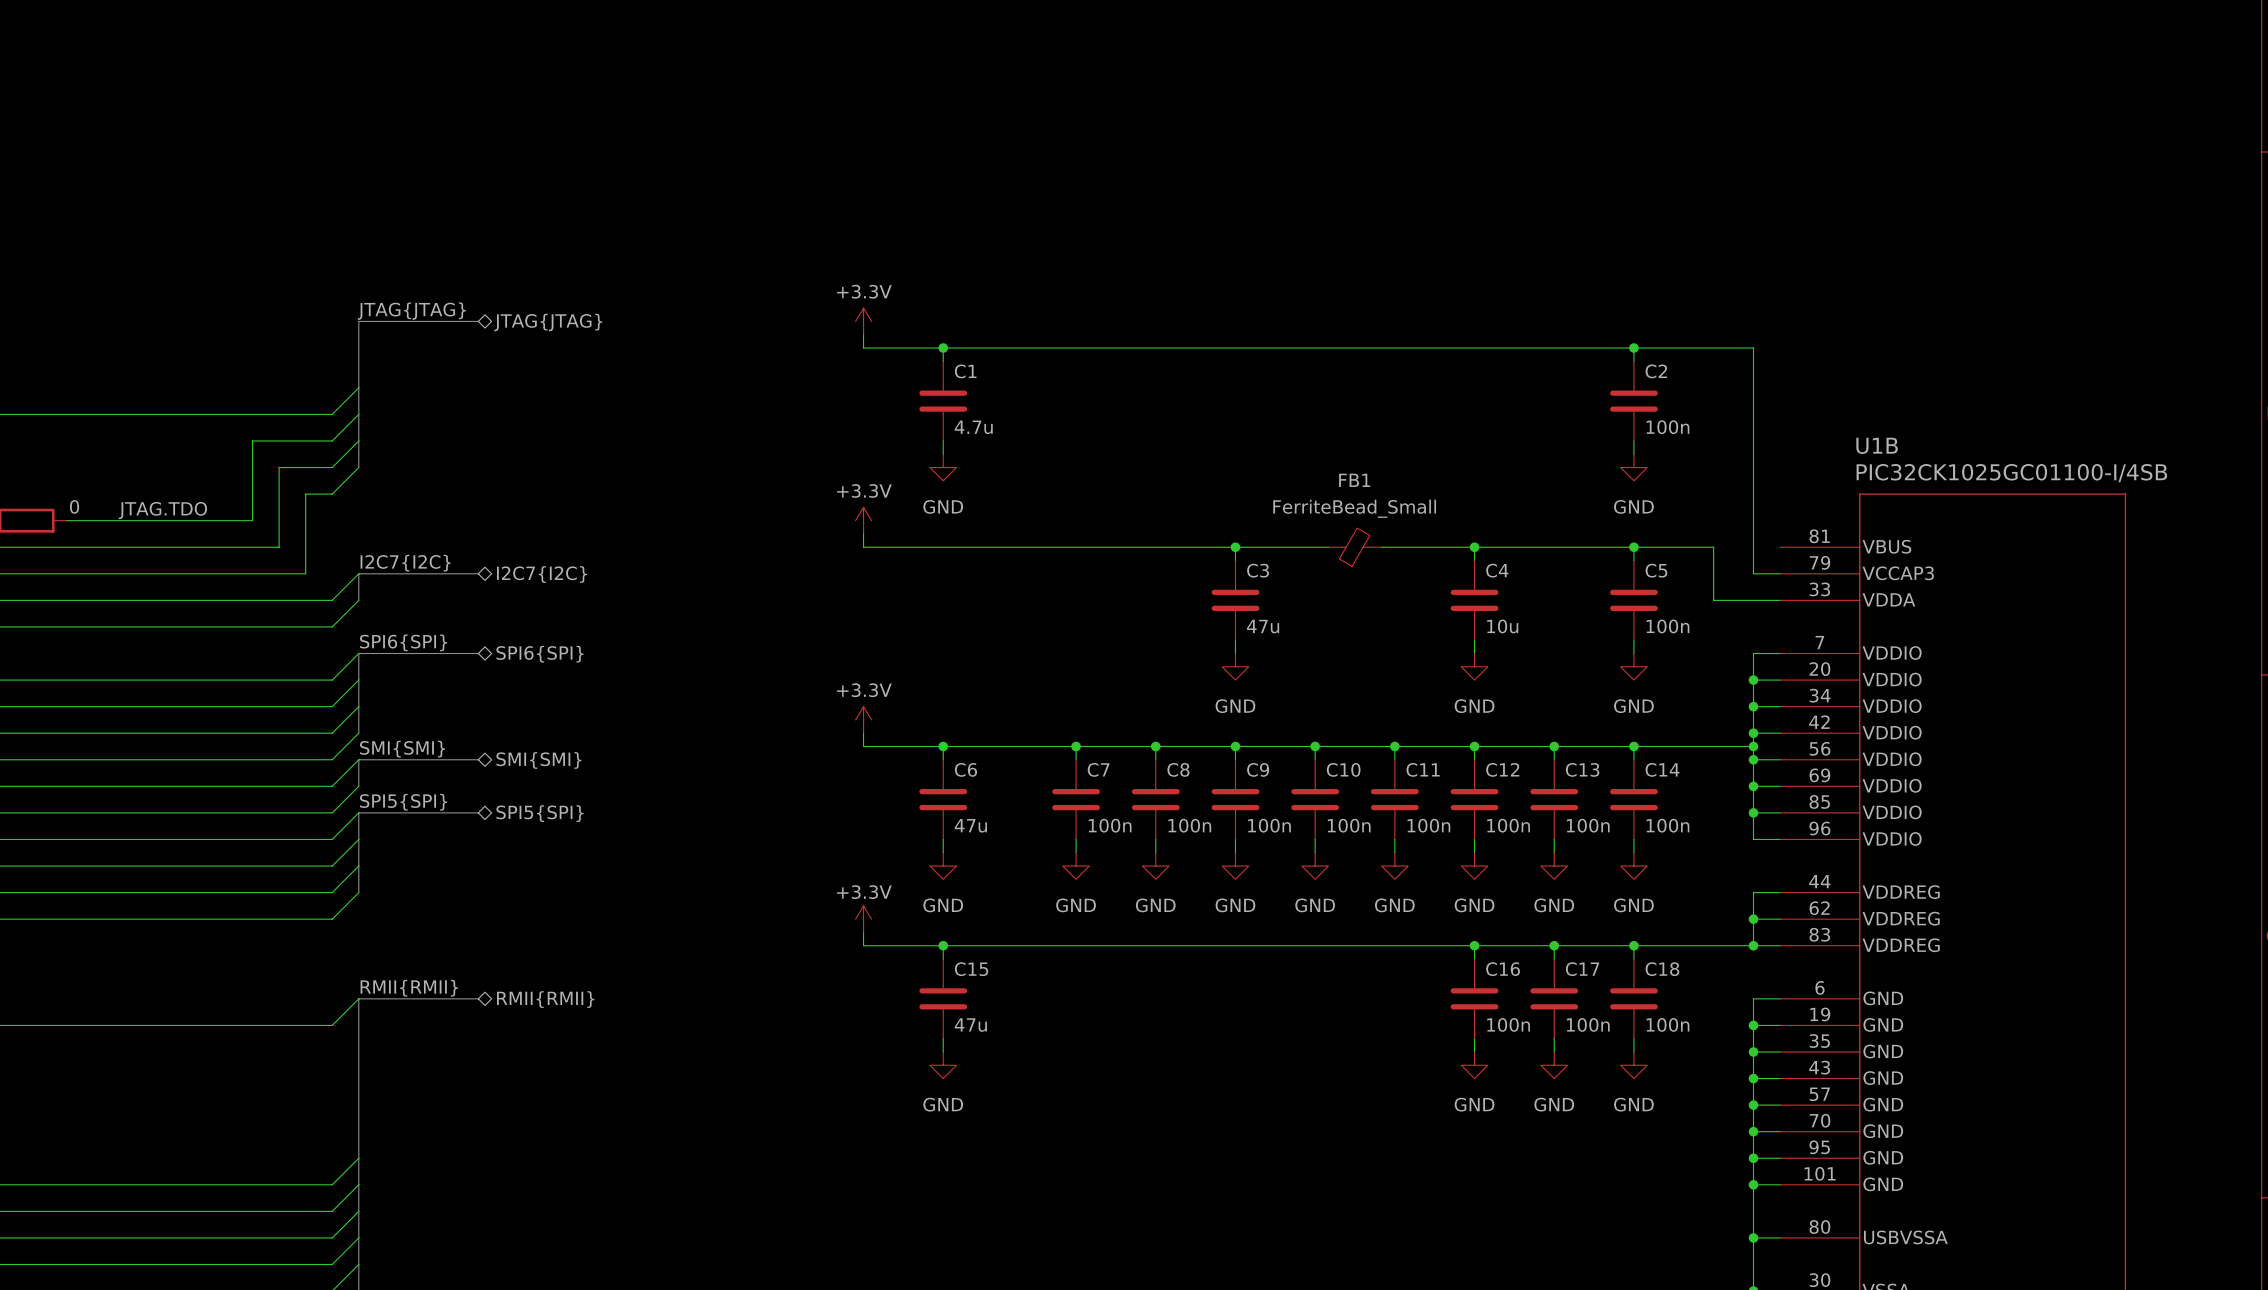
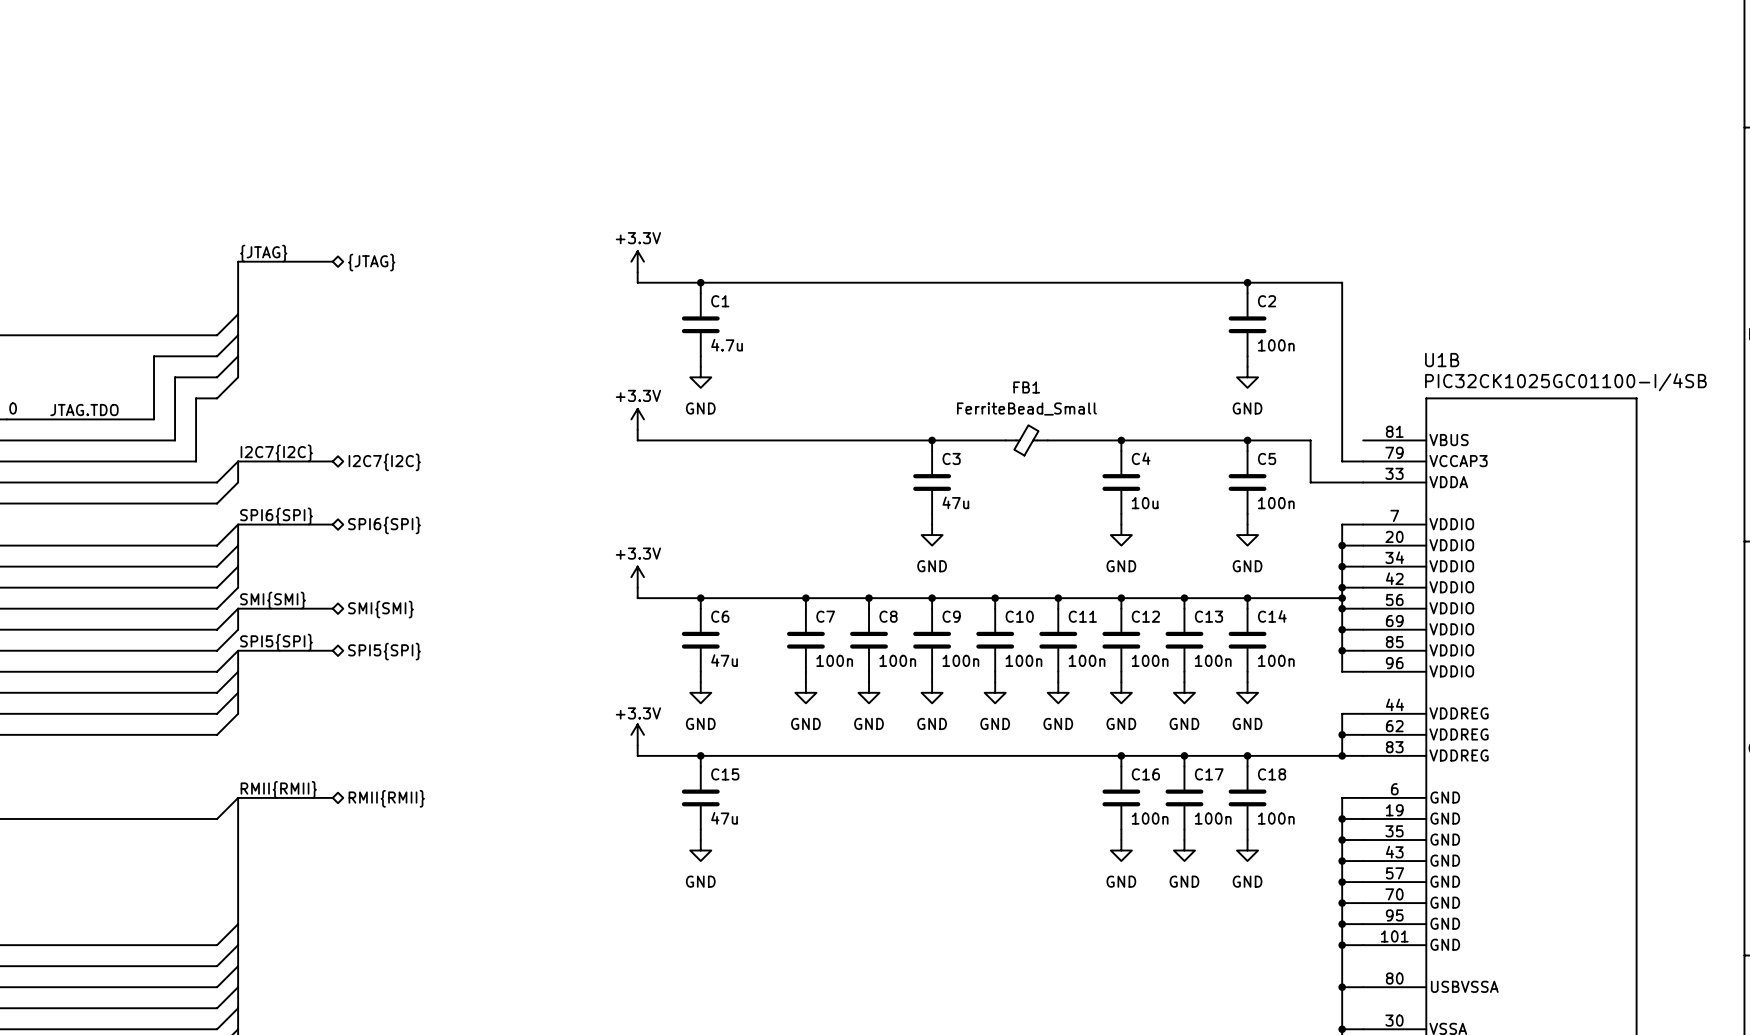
label: JTAG{JTAG} (411, 311) -> {JTAG} (263, 253)
hierarchical label: JTAG{JTAG} (548, 322) -> {JTAG} (371, 262)

